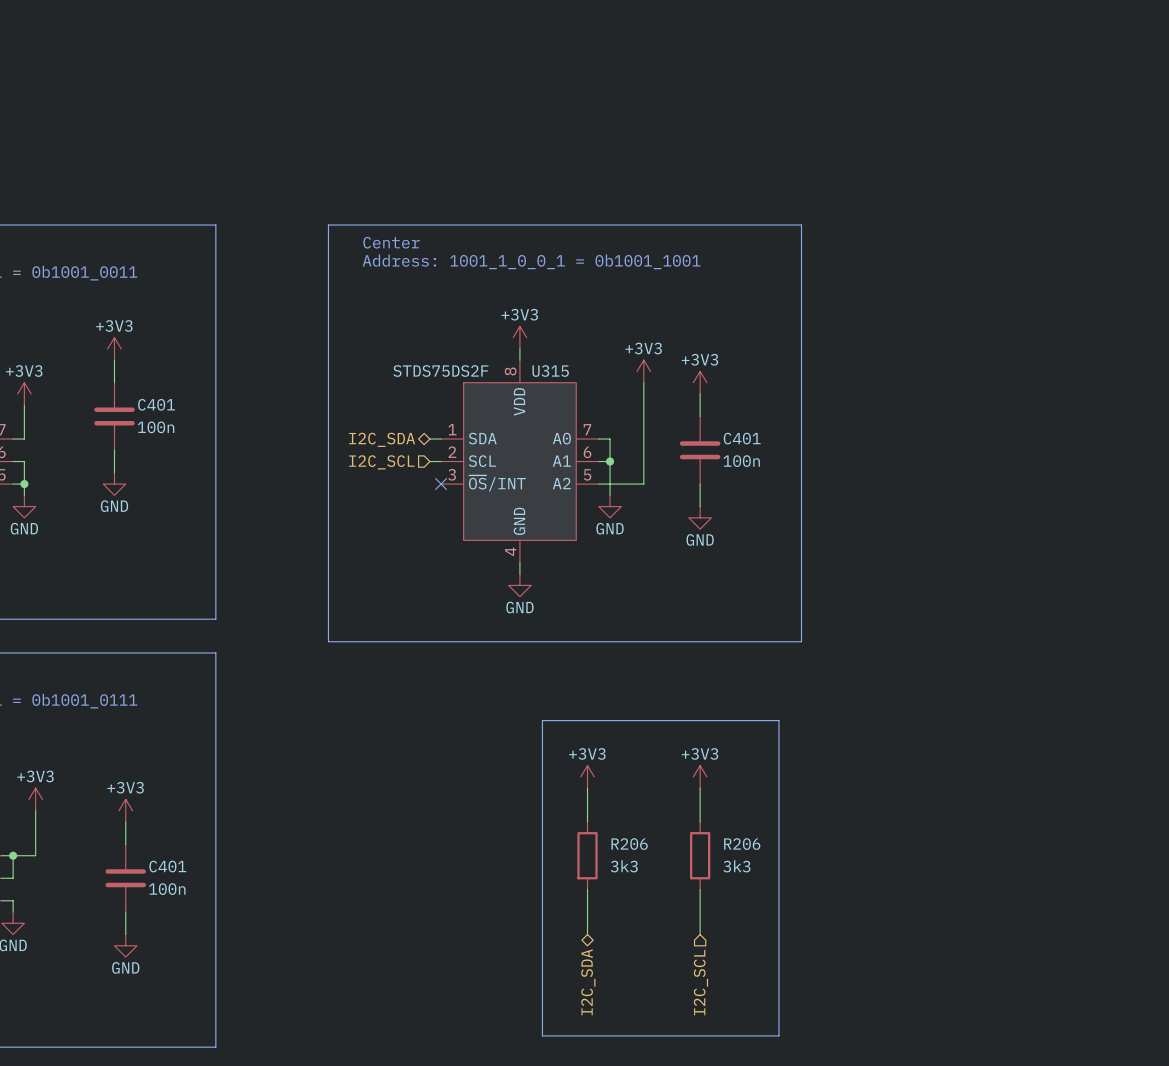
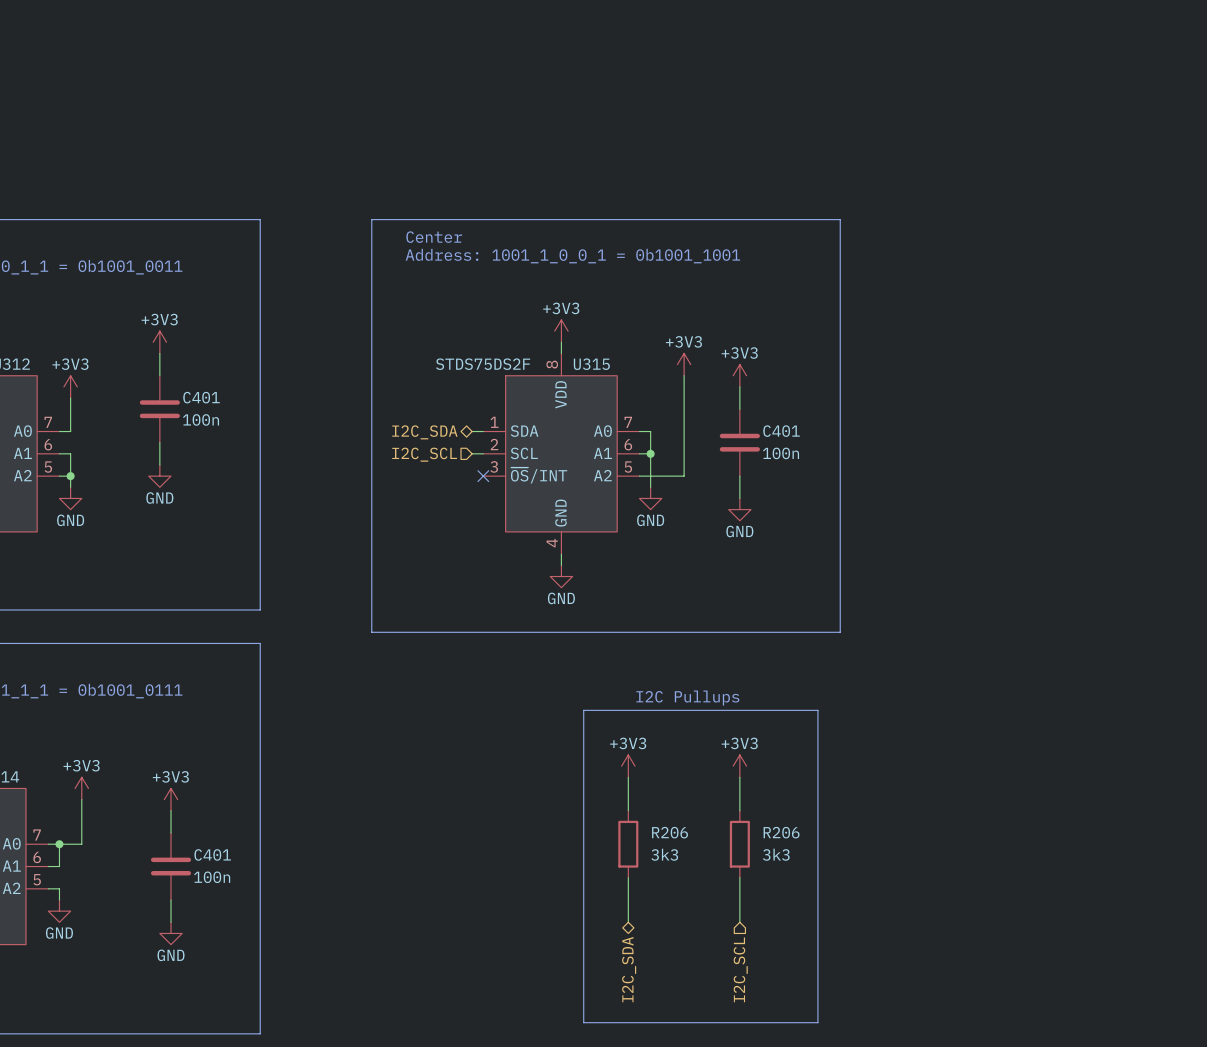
text: none -> I2C Pullups (687, 698)

